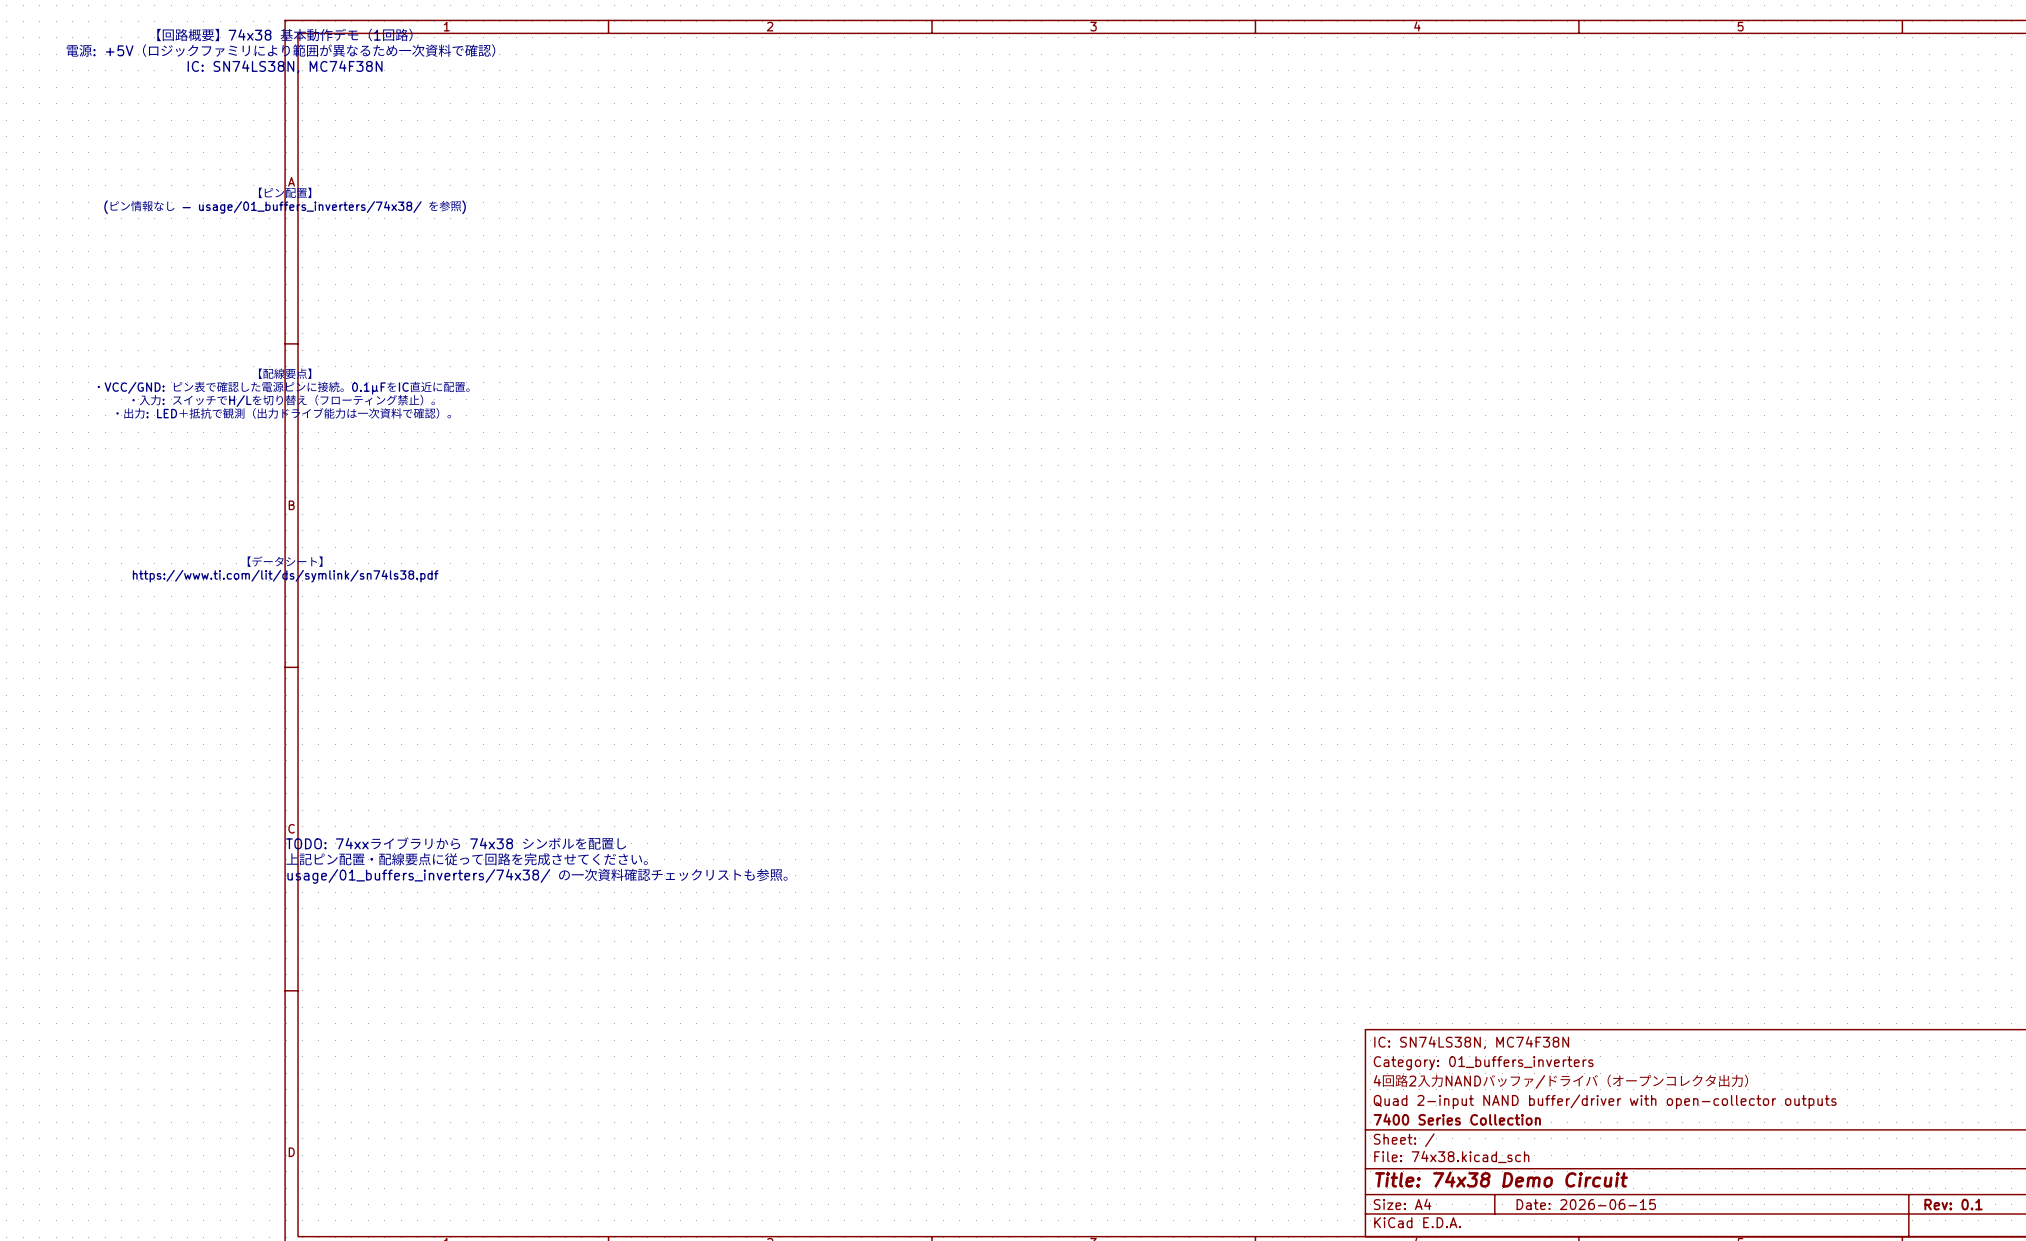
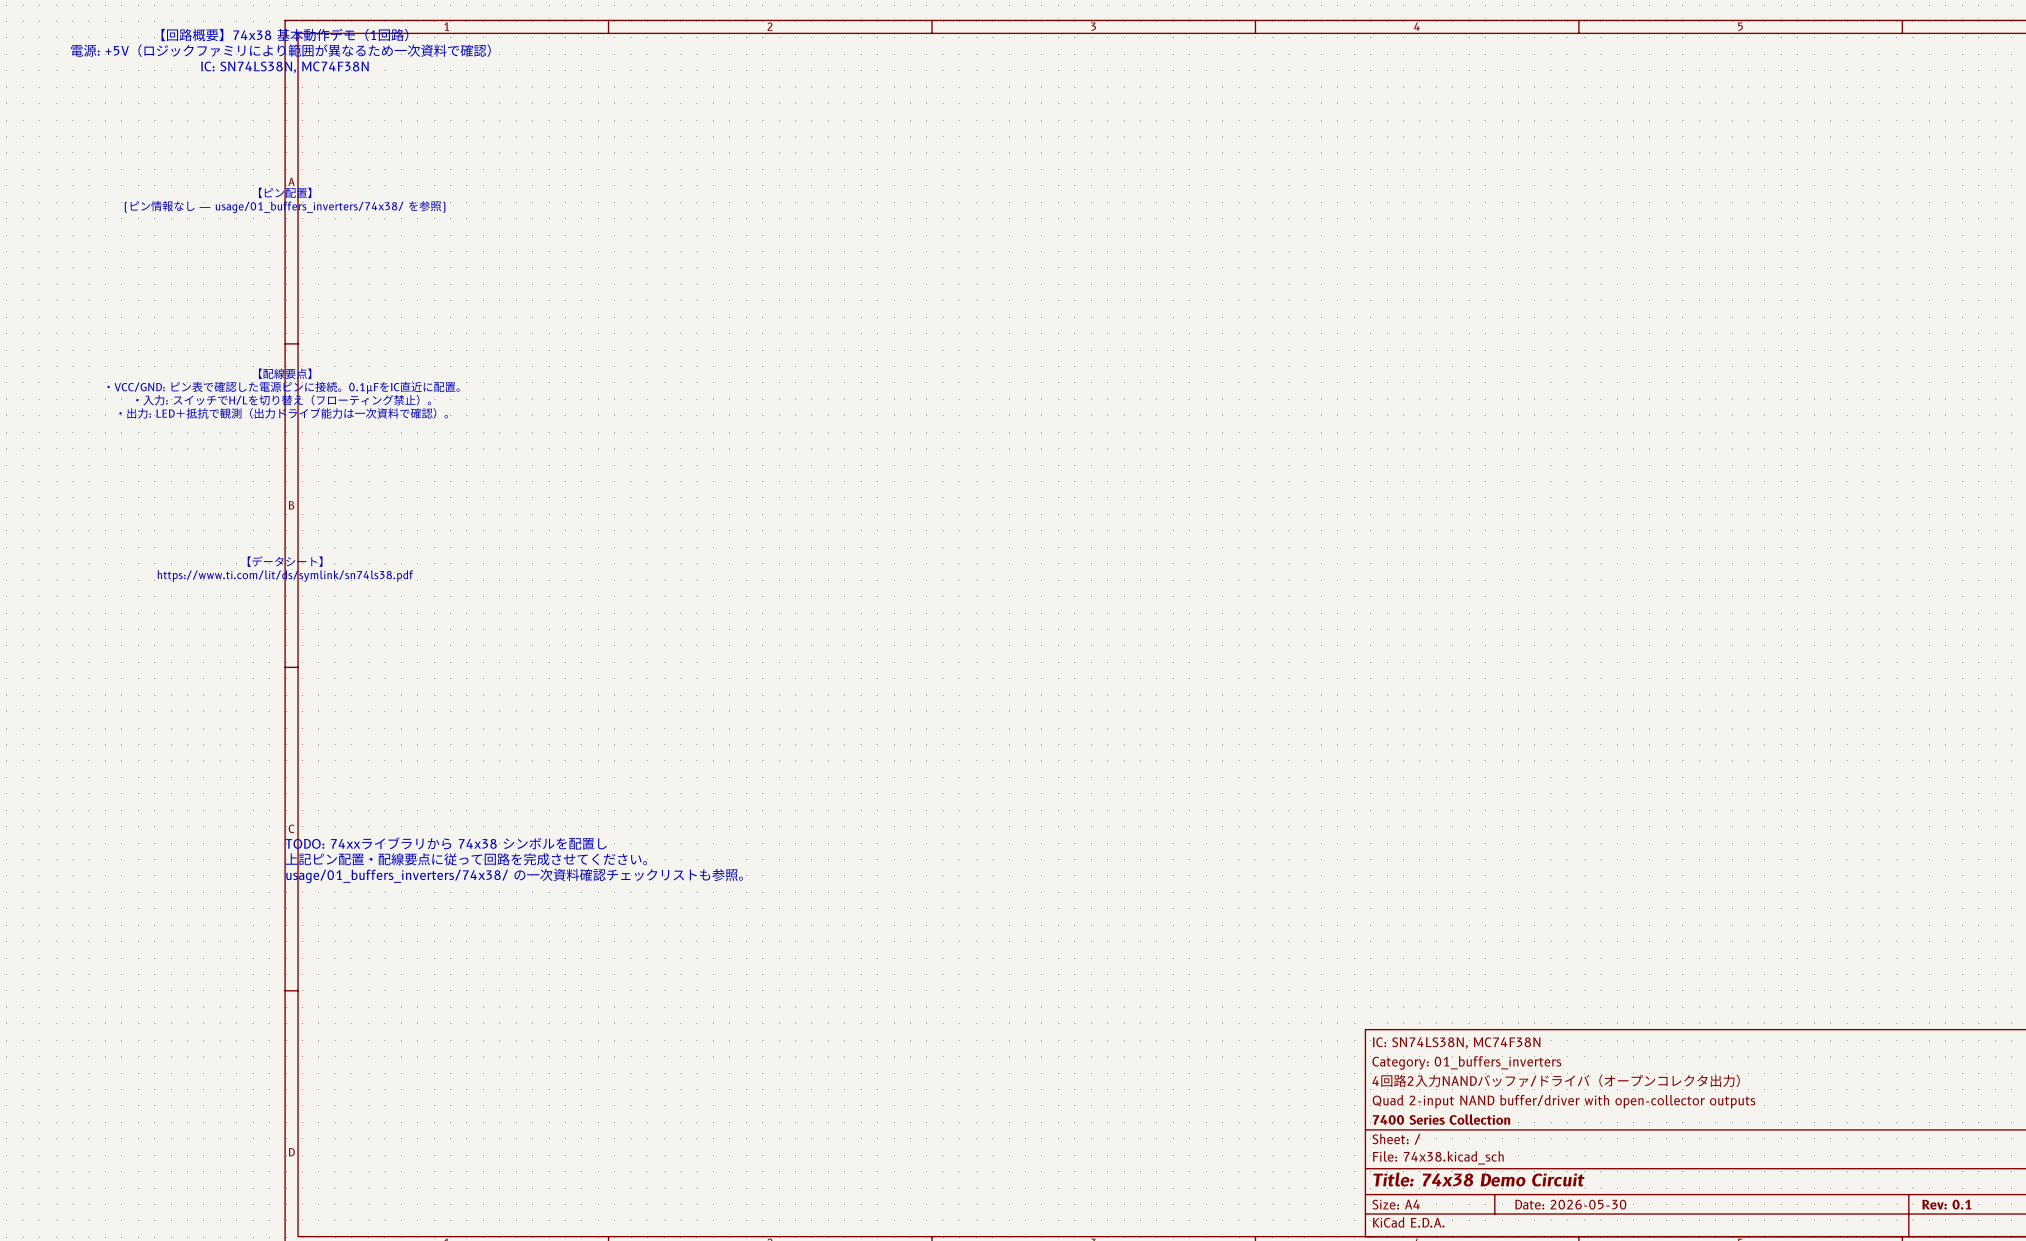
title block: Date: 2026-06-15 (1586, 1204) -> Date: 2026-05-30 (1570, 1204)

